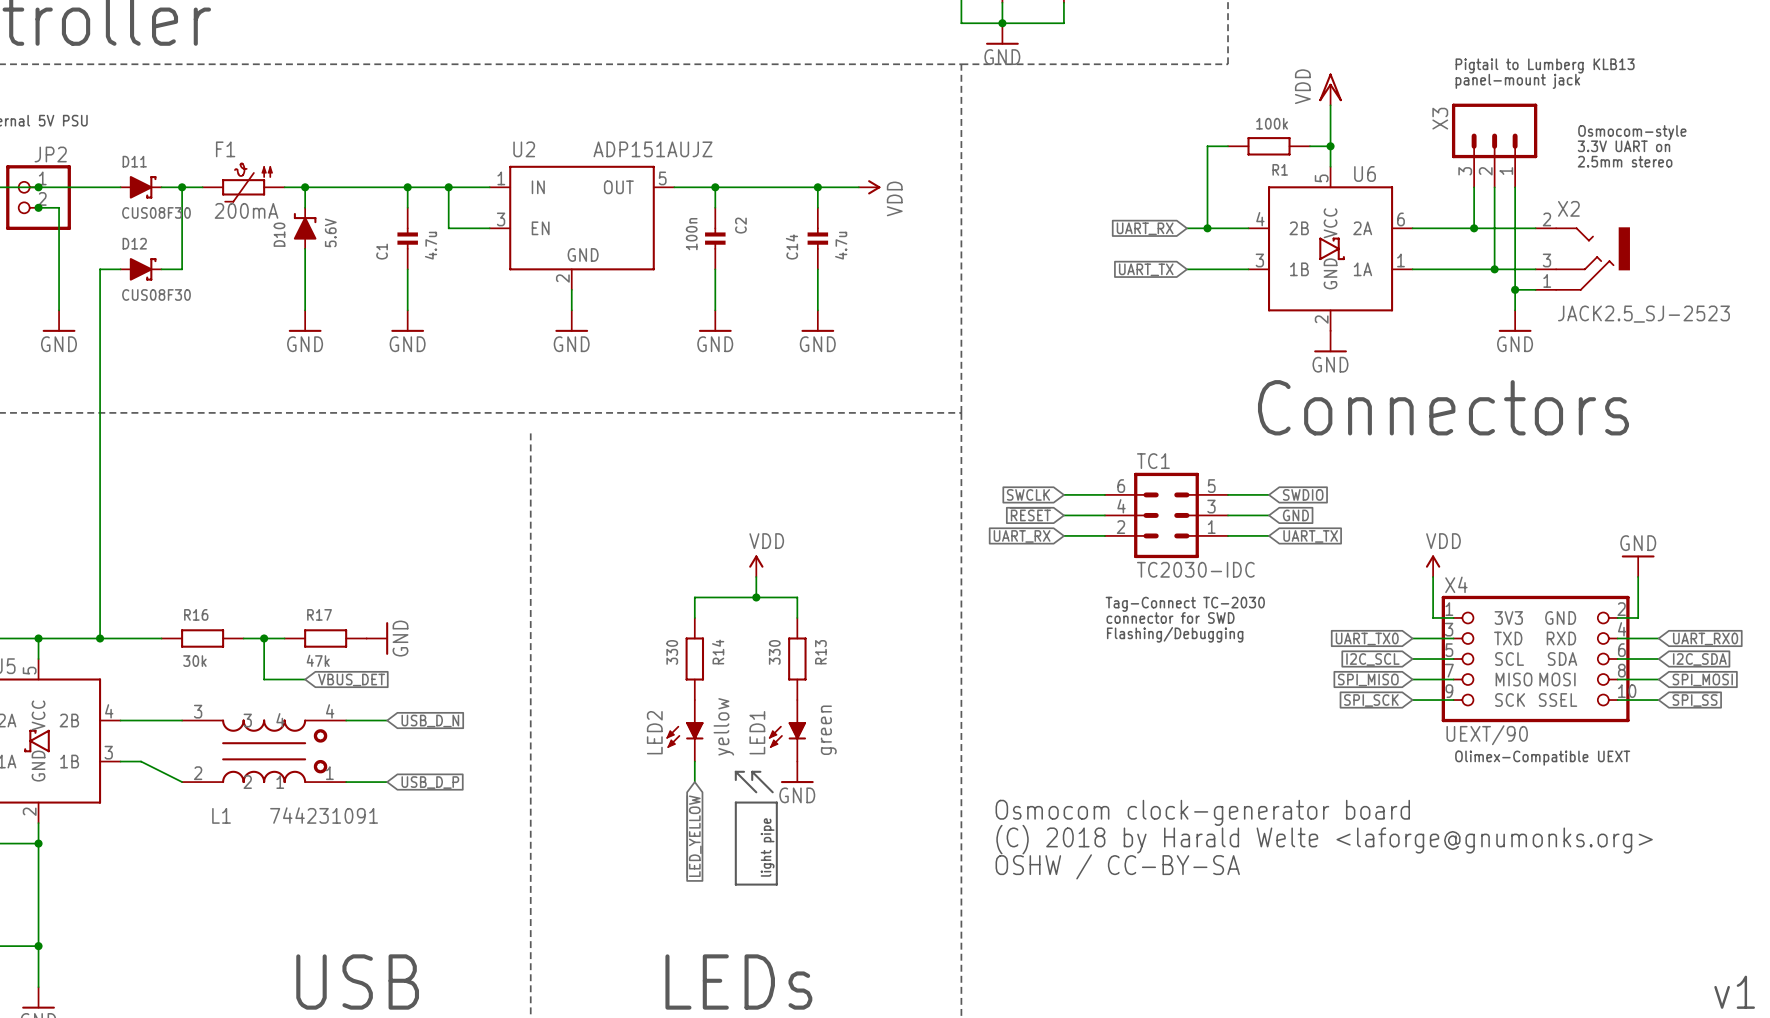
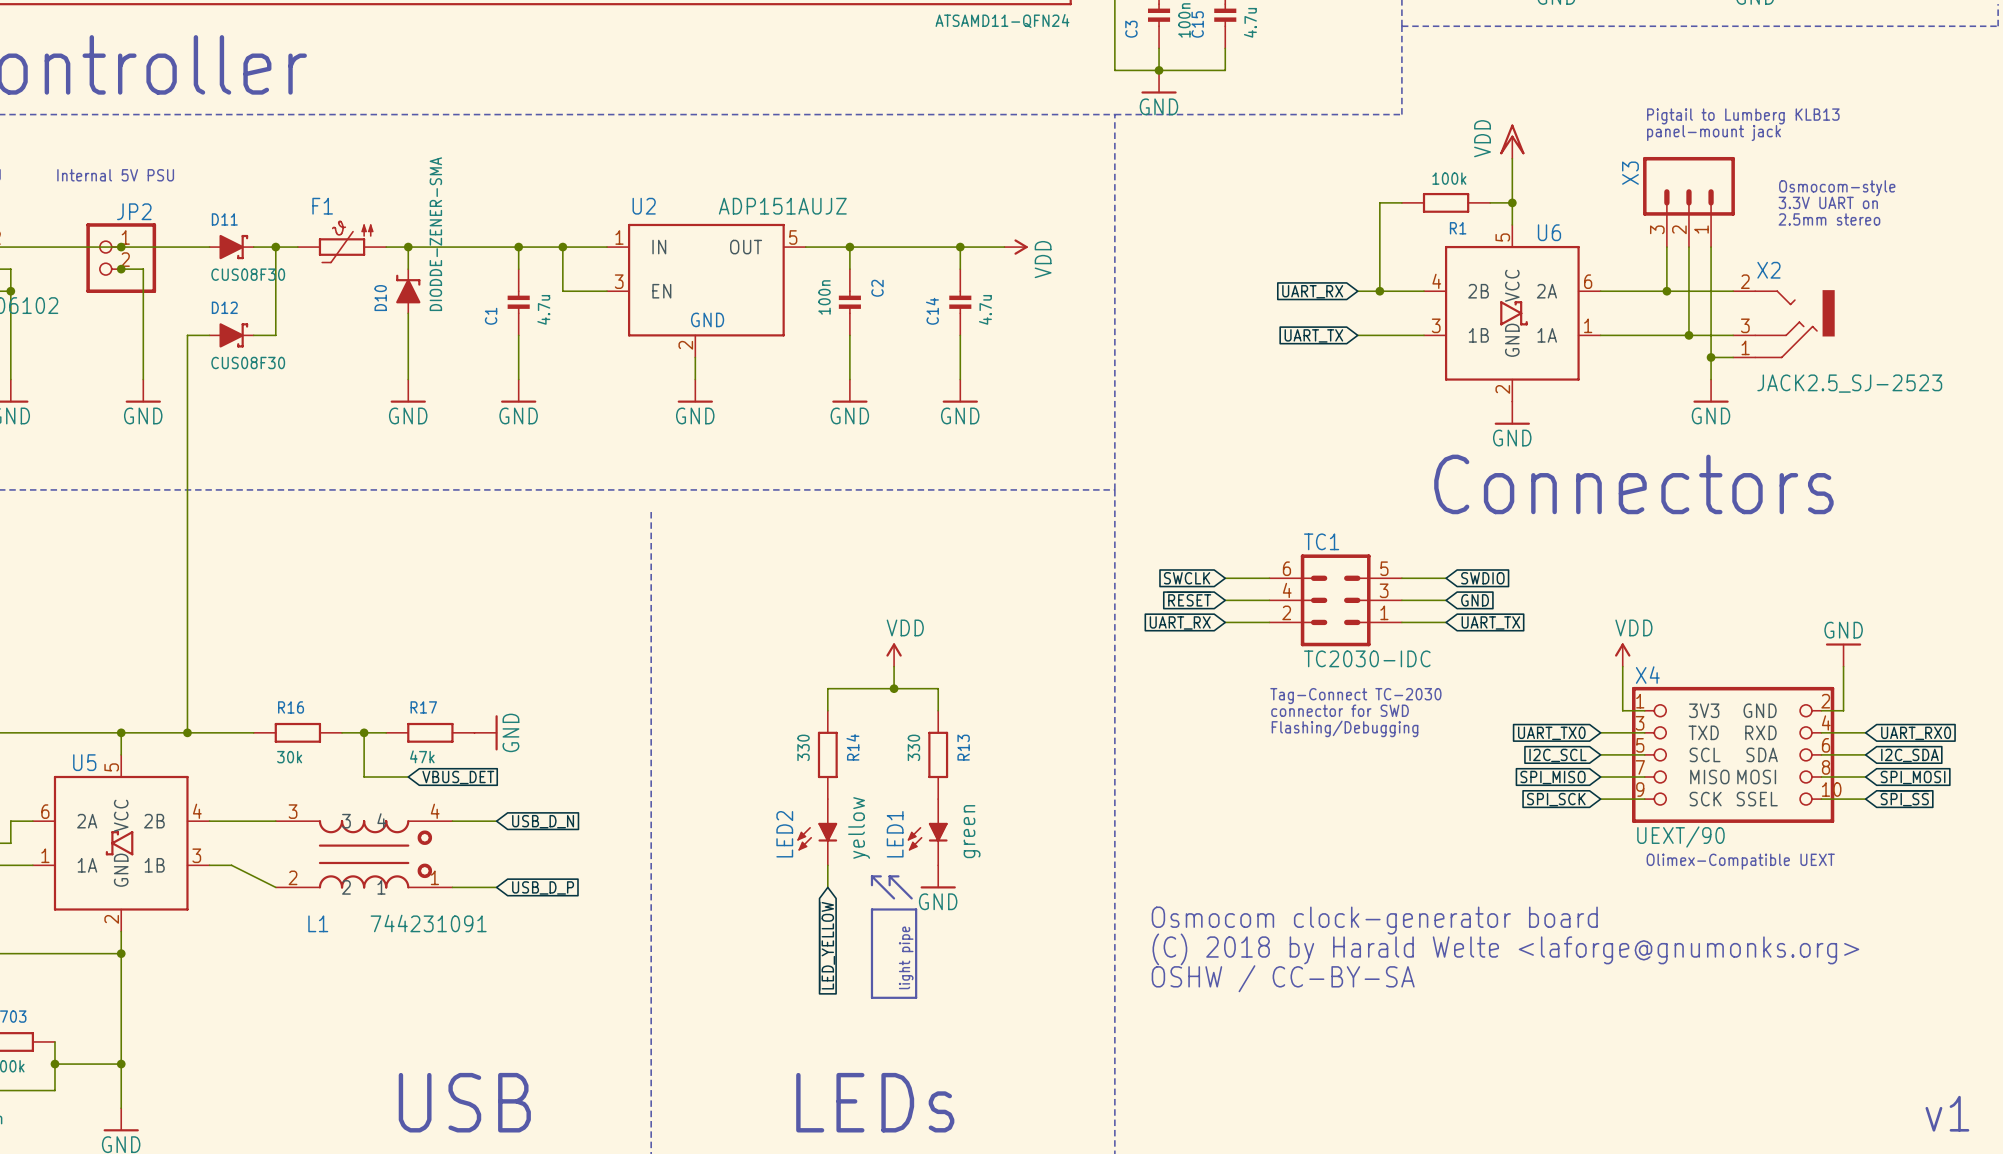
F1 value: 200mA (246, 210) -> none
D10 value: 5.6V (330, 232) -> DIODDE-ZENER-SMA (435, 234)

